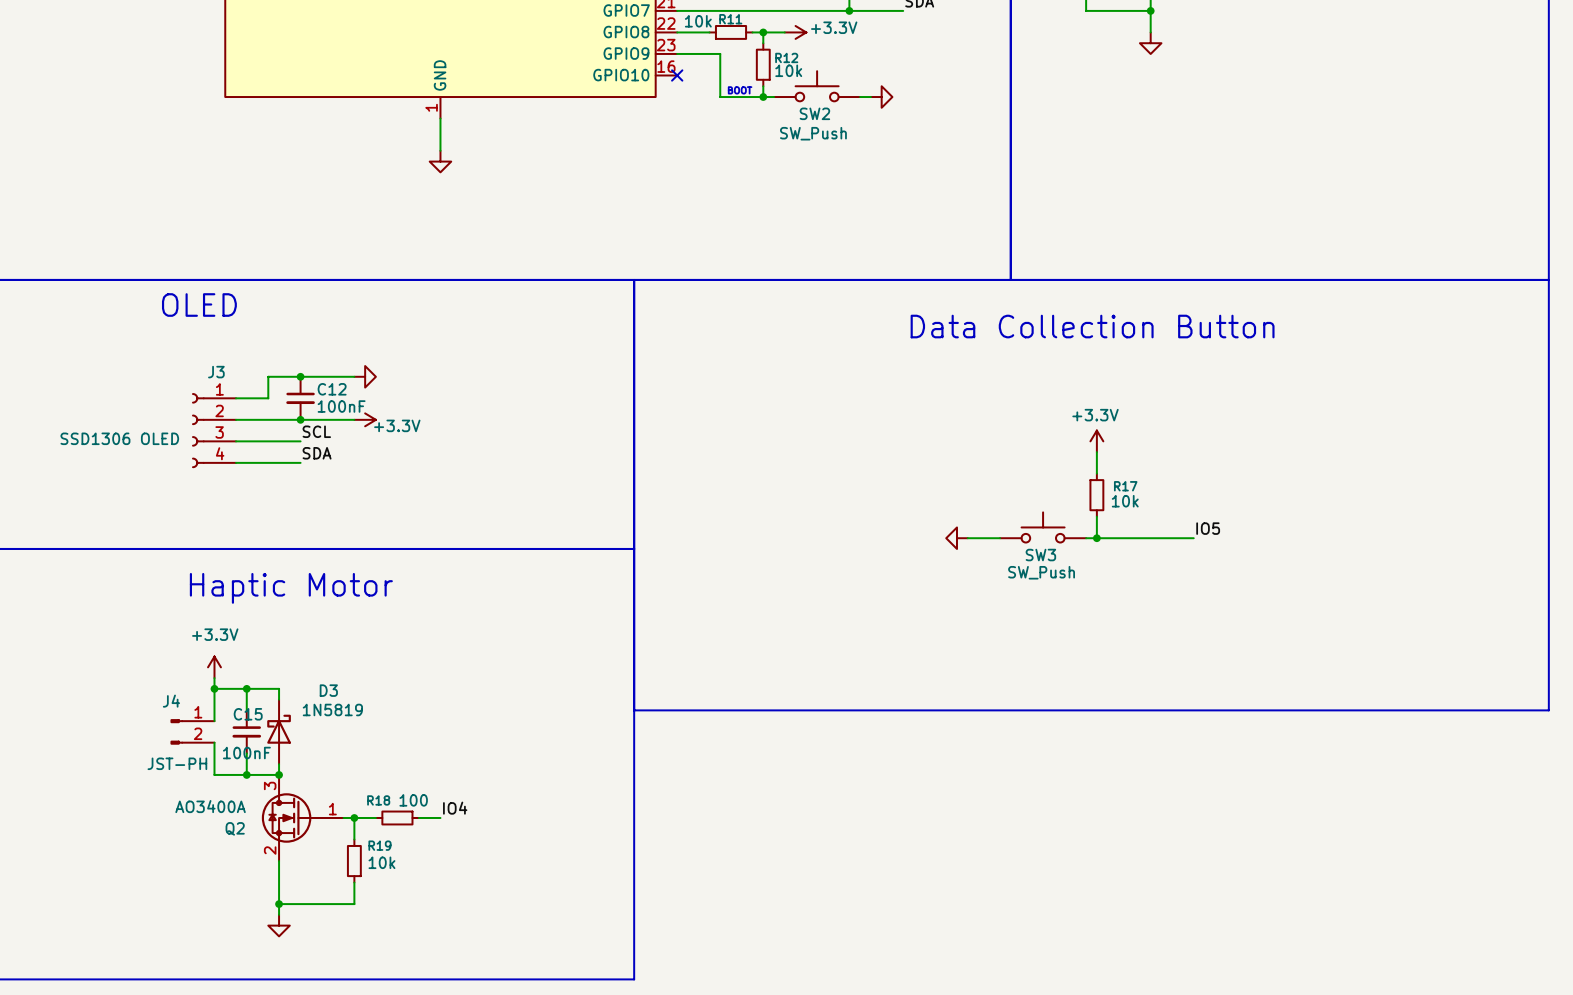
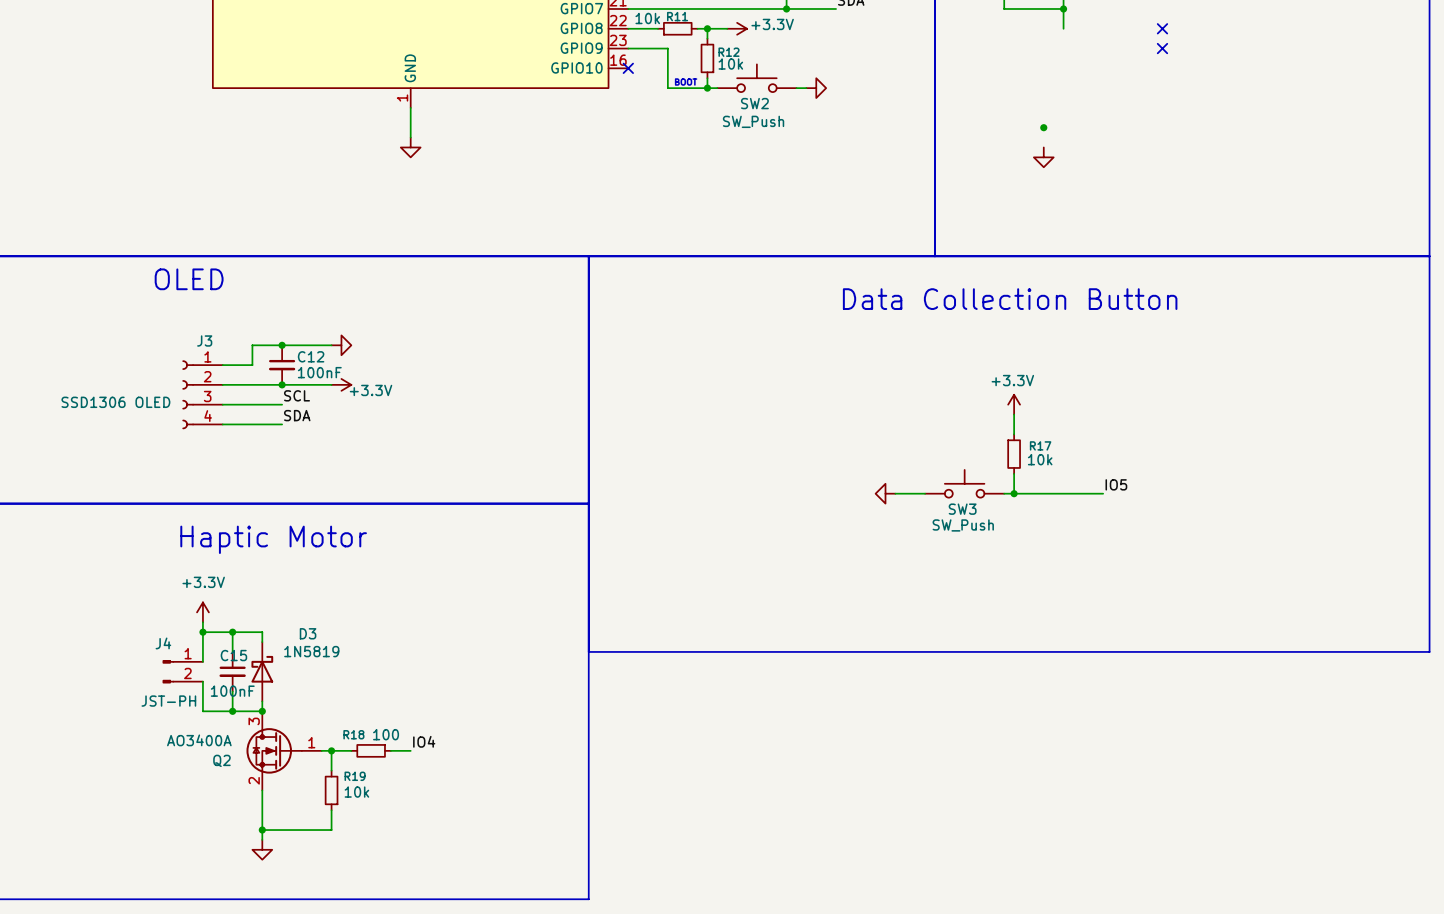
no-connect mark: none -> (1162, 28)
power symbol position: (1150, 43) -> (1043, 157)
no-connect mark: none -> (1162, 48)
junction: none -> (1043, 127)

